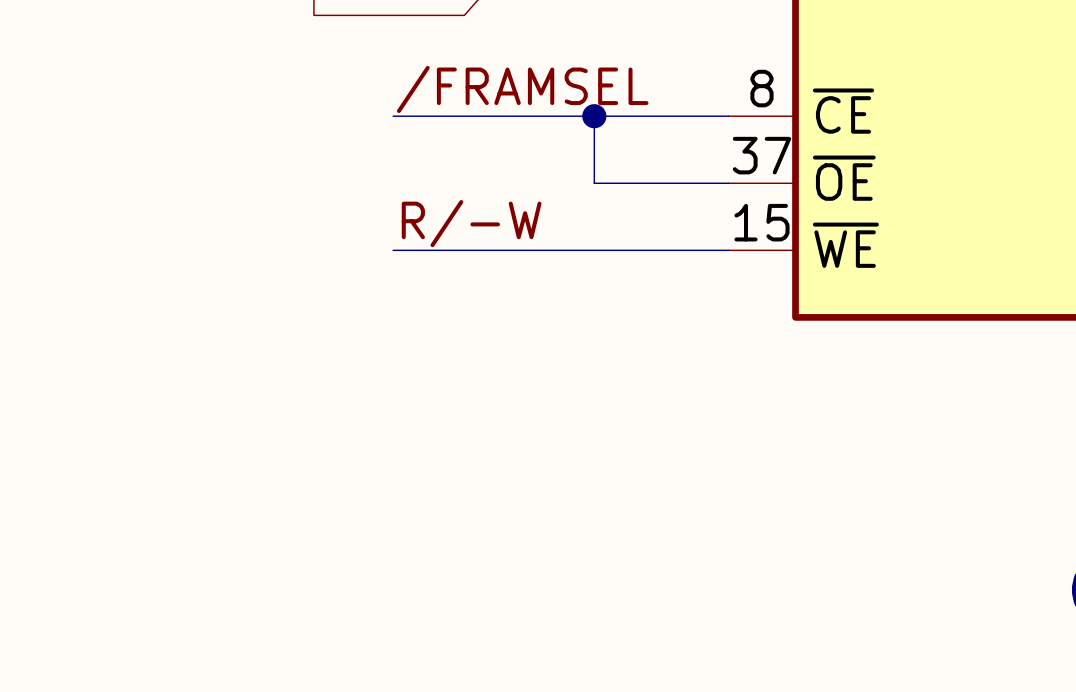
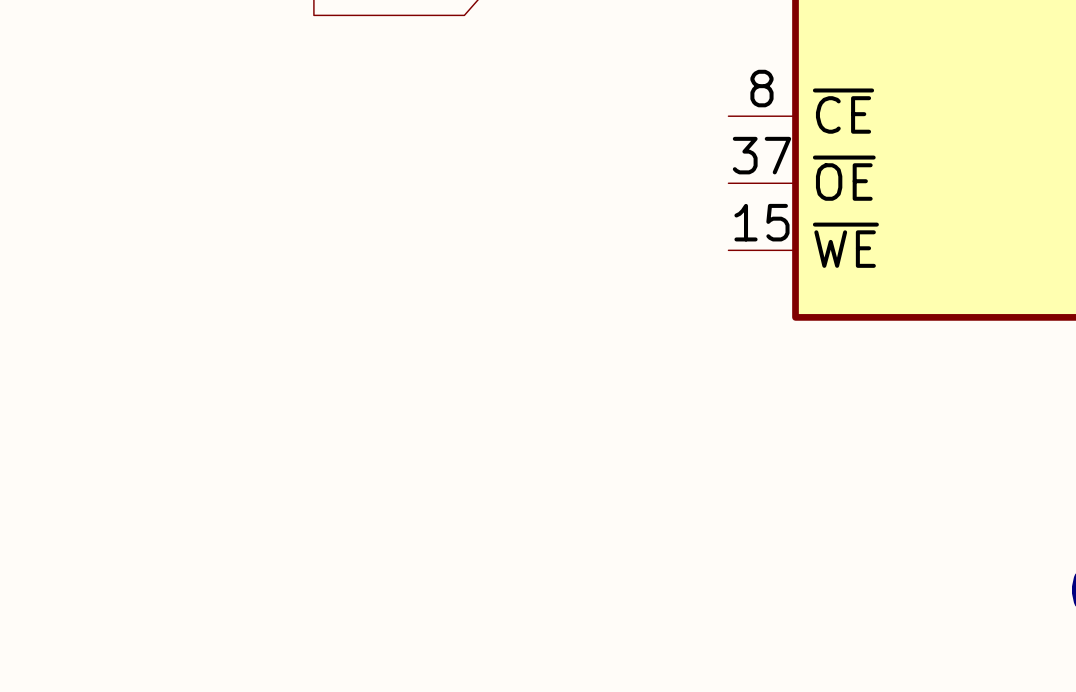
label: /FRAMSEL (522, 89) -> none
wire: (393, 116) (728, 116) -> none
wire: (594, 116) (594, 183) (728, 183) -> none
junction: (594, 116) -> none
label: R/-W (471, 223) -> none
wire: (393, 250) (728, 250) -> none

